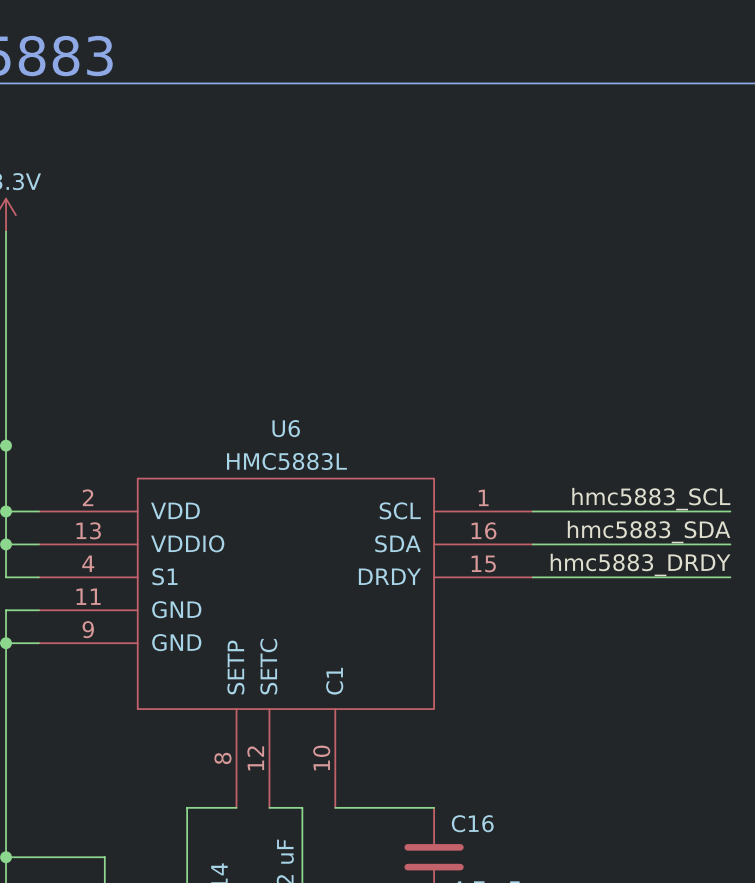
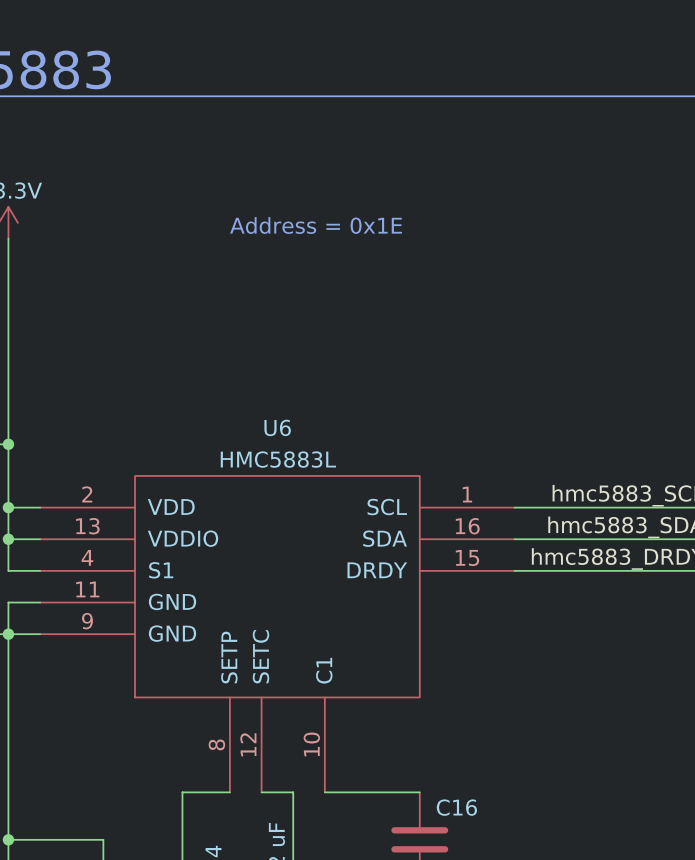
text: none -> Address = 0x1E (316, 225)

